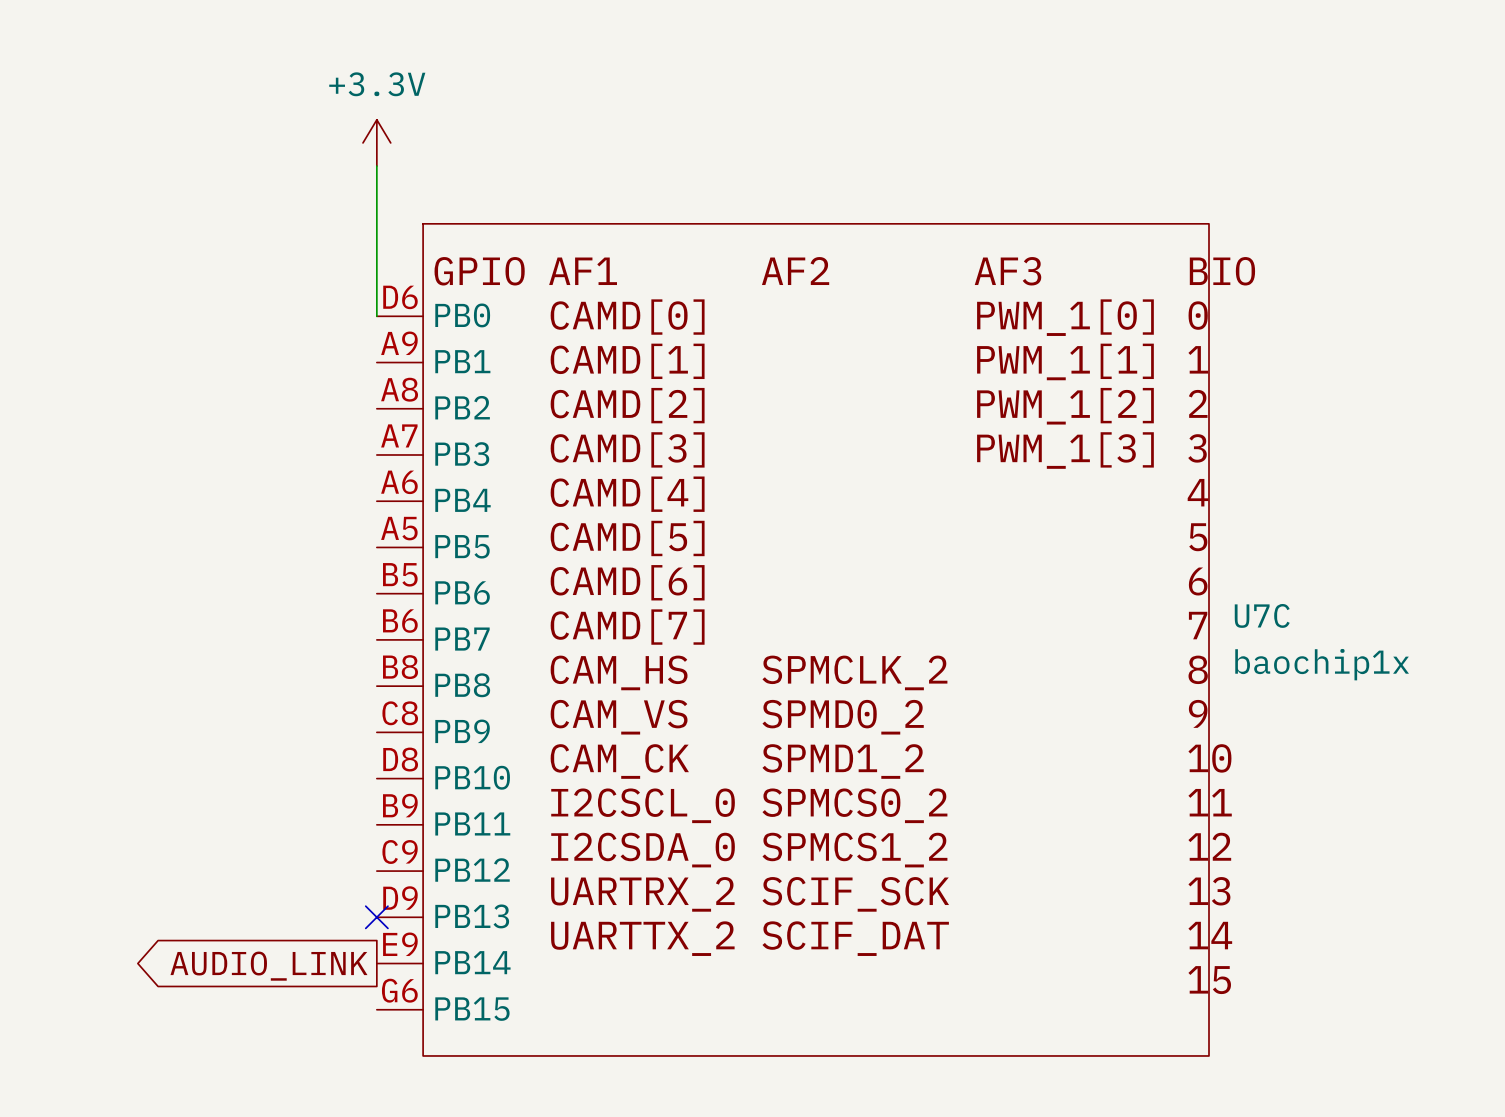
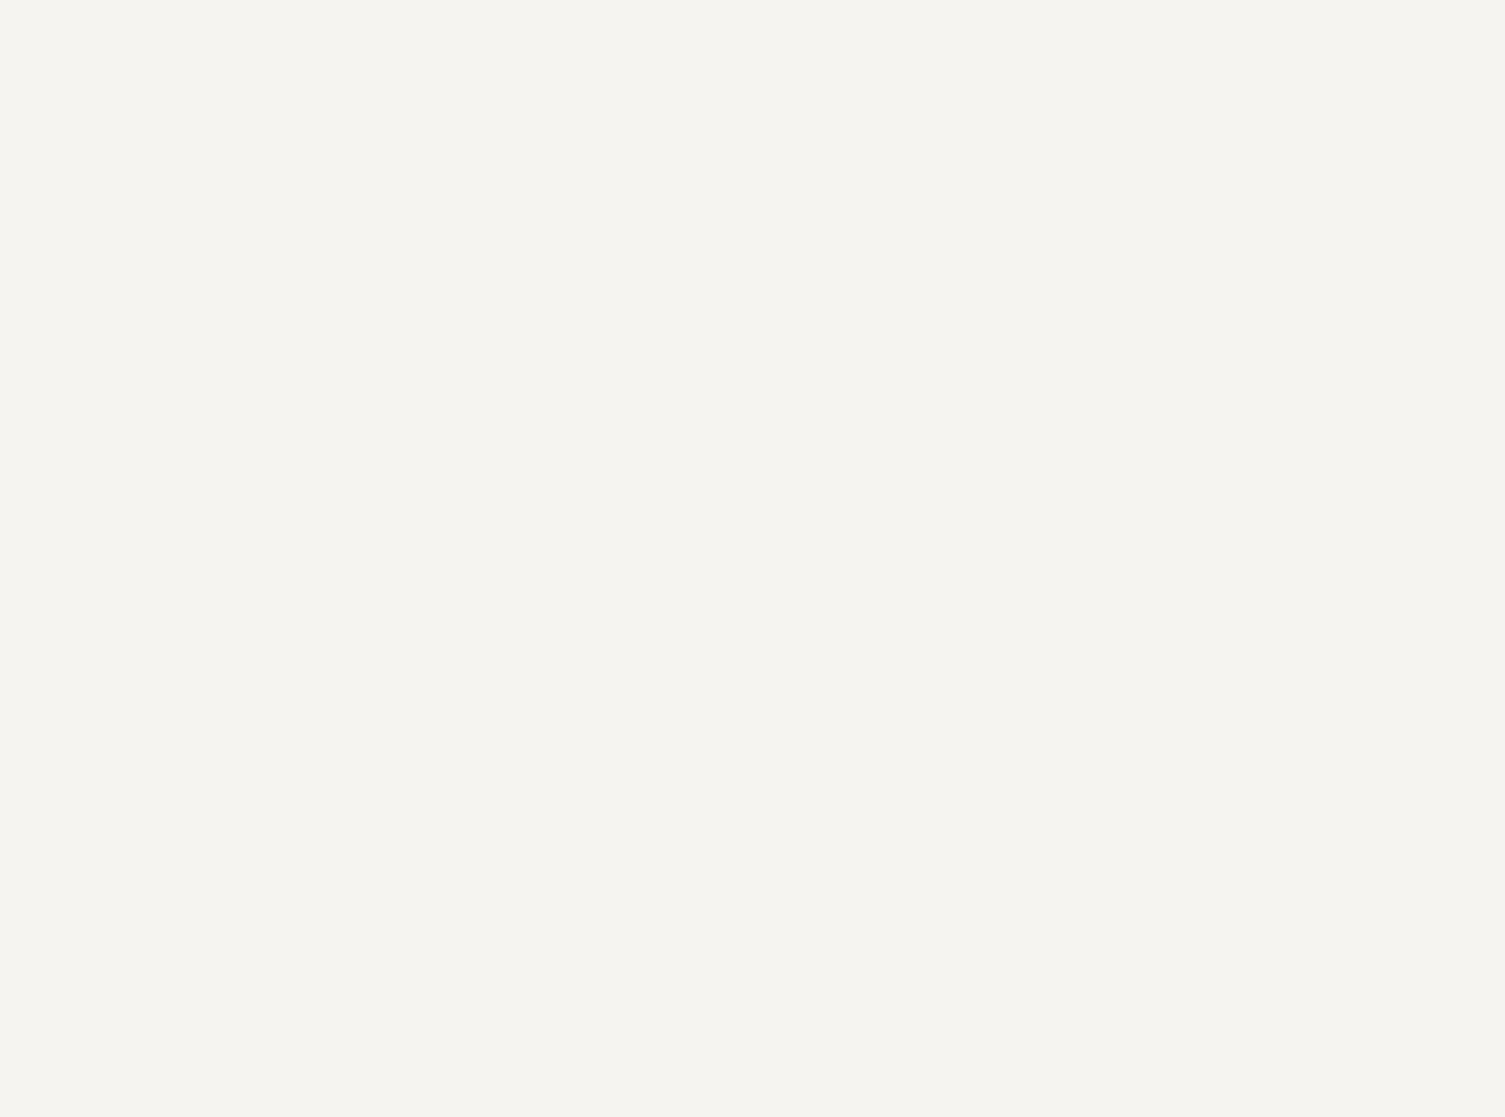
power symbol: +3.3V (376, 142) -> none
wire: (376, 166) (376, 316) -> none
U7C: baochip1x (792, 639) -> none
no-connect mark: (376, 917) -> none
global label: AUDIO_LINK (268, 966) -> none

